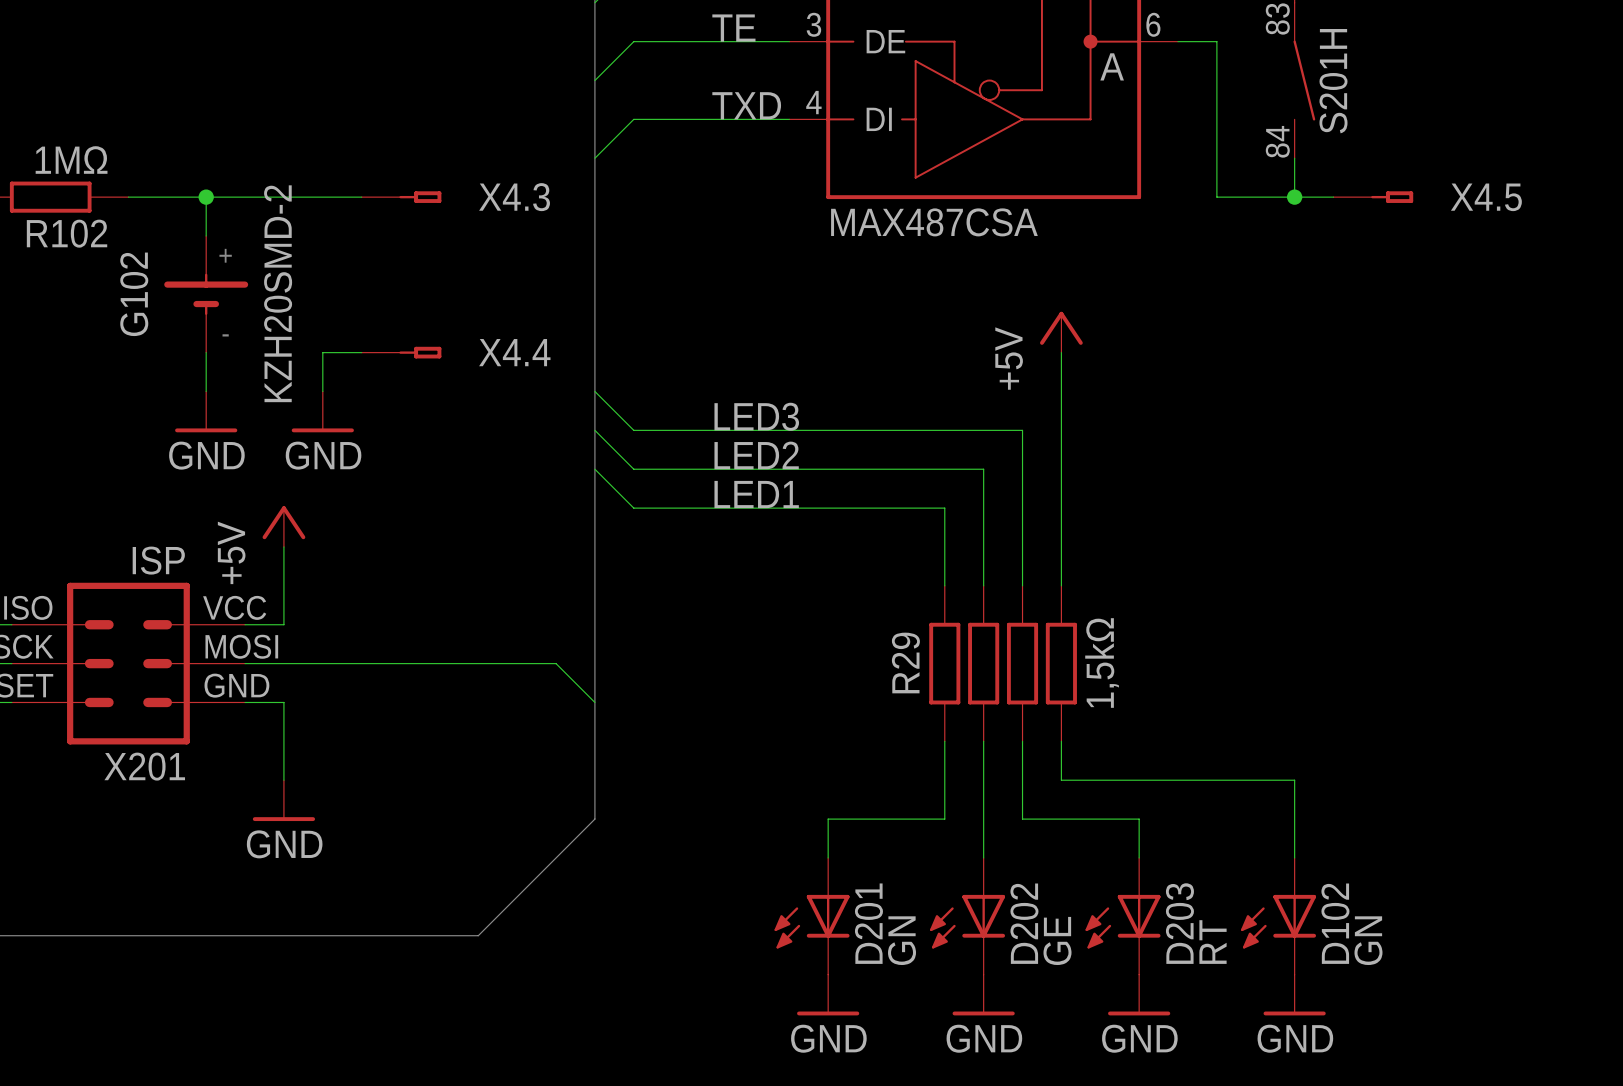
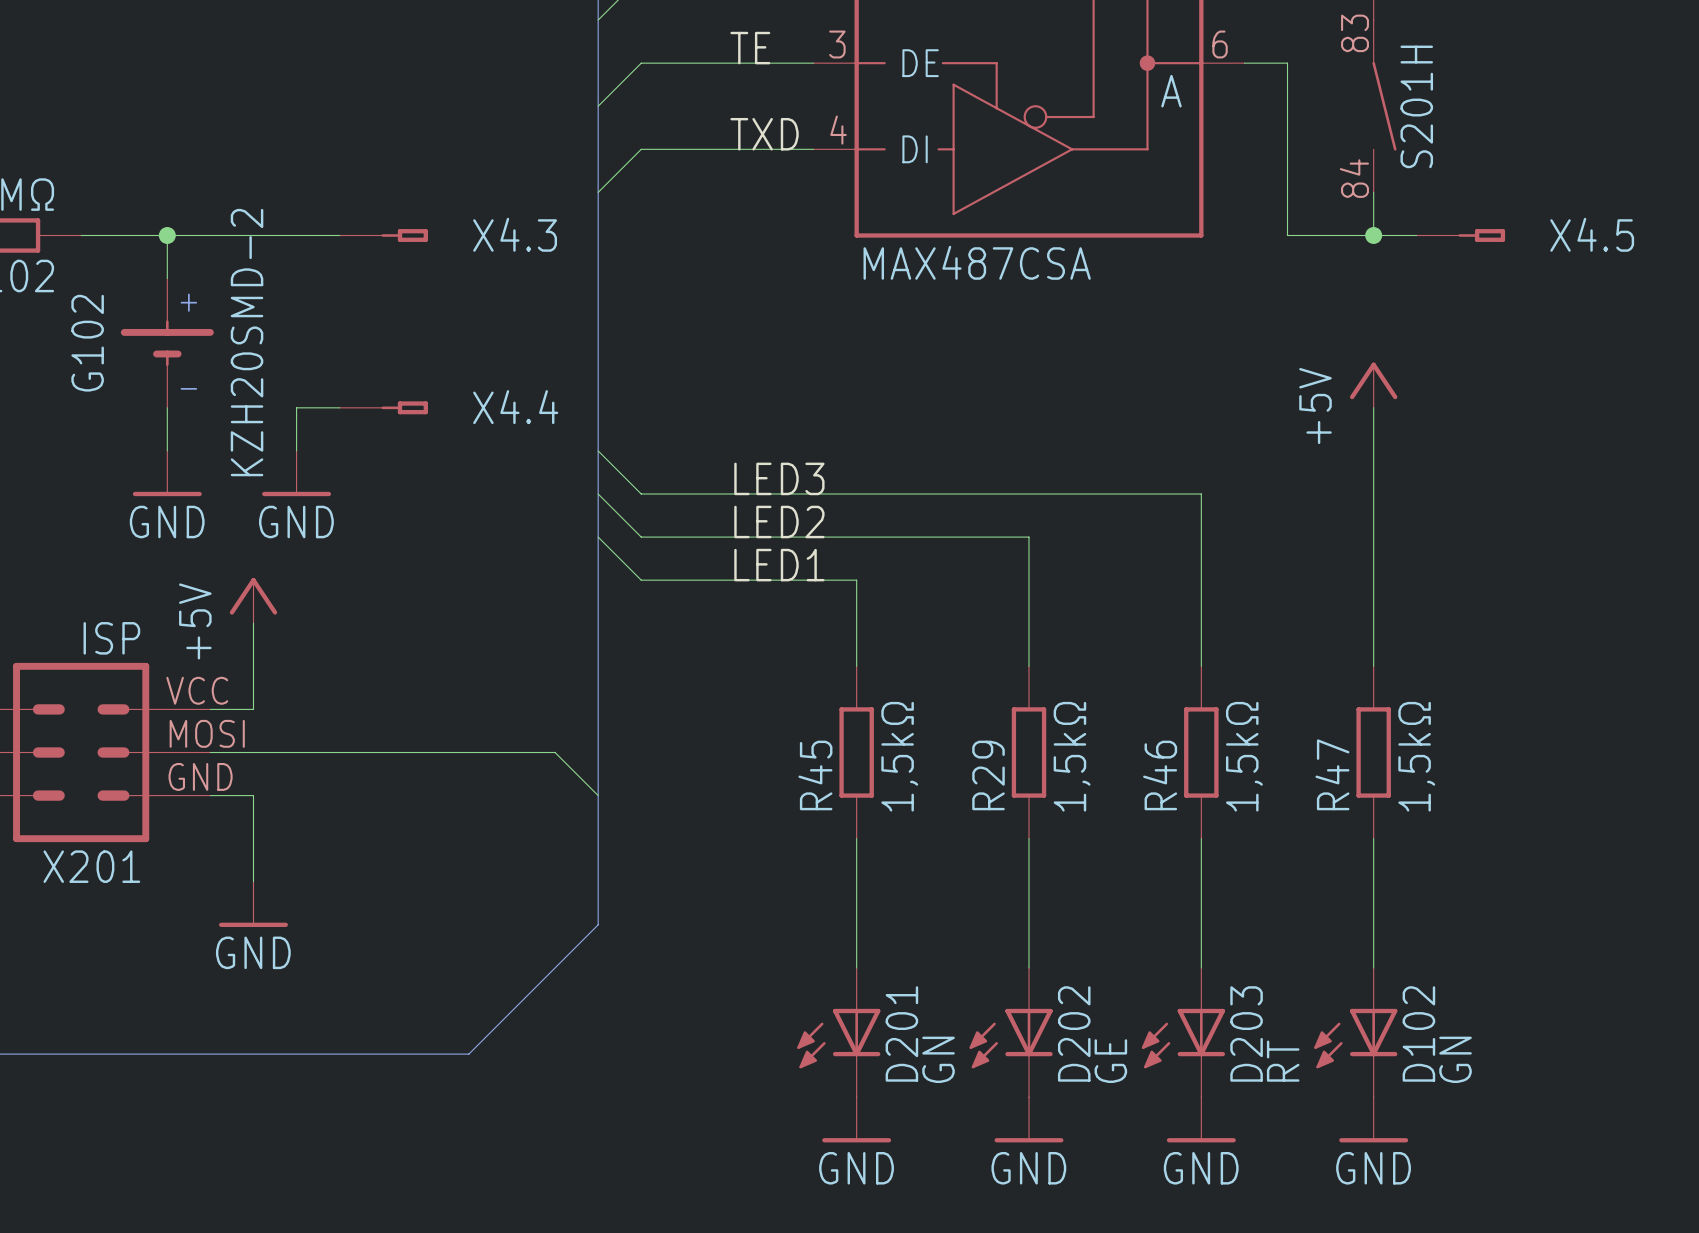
power symbol position: +5V (1061, 332) -> +5V (1373, 385)
wire: (1061, 352) (1061, 585) -> (1373, 407) (1373, 666)
wire: (1022, 430) (1022, 585) -> (1072, 494) (1201, 494) (1201, 666)
wire: (828, 508) (944, 508) (944, 585) -> (856, 580) (856, 666)
R29 symbol: [929, 585, 1077, 742] -> [1011, 666, 1047, 839]
R29 name position: R29 (905, 662) -> R29 (988, 775)
R45: none -> 1,5kΩ (856, 752)
R29 value position: 1,5kΩ (1102, 663) -> 1,5kΩ (1072, 756)
R46: none -> 1,5kΩ (1201, 752)
R47: none -> 1,5kΩ (1373, 752)
wire: (944, 741) (944, 819) (828, 819) -> (856, 838) (856, 924)
wire: (1022, 741) (1022, 819) (1139, 819) -> (1201, 838) (1201, 924)
wire: (1061, 741) (1061, 780) (1294, 780) -> (1373, 838) (1373, 881)

